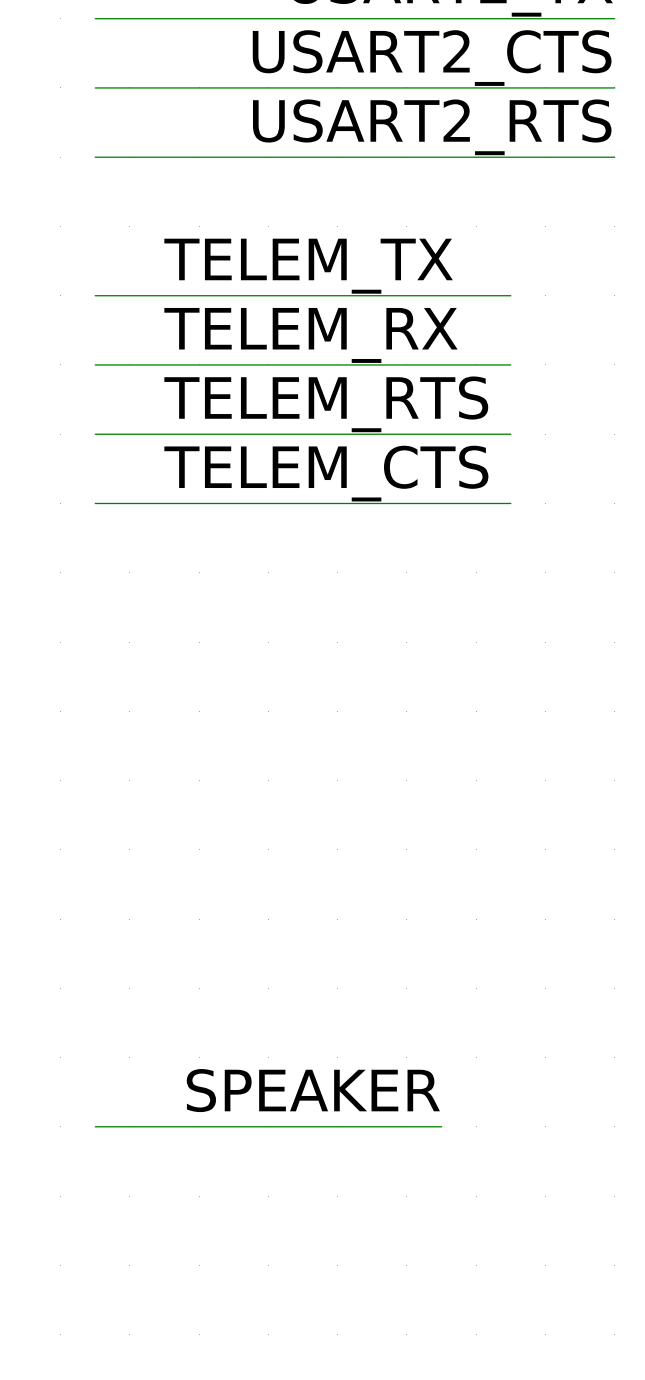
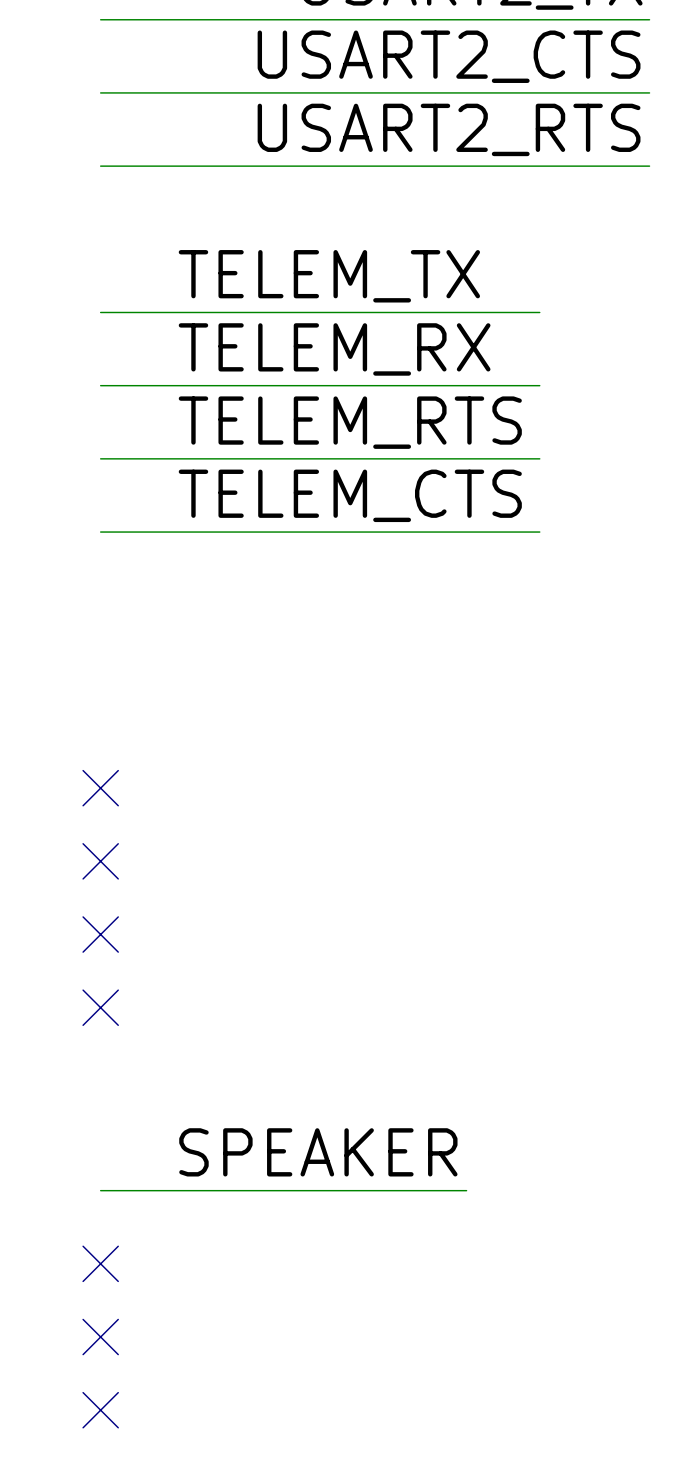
no-connect mark: none -> (100, 788)
no-connect mark: none -> (100, 861)
no-connect mark: none -> (100, 934)
no-connect mark: none -> (100, 1007)
no-connect mark: none -> (100, 1263)
no-connect mark: none -> (100, 1337)
no-connect mark: none -> (100, 1410)

